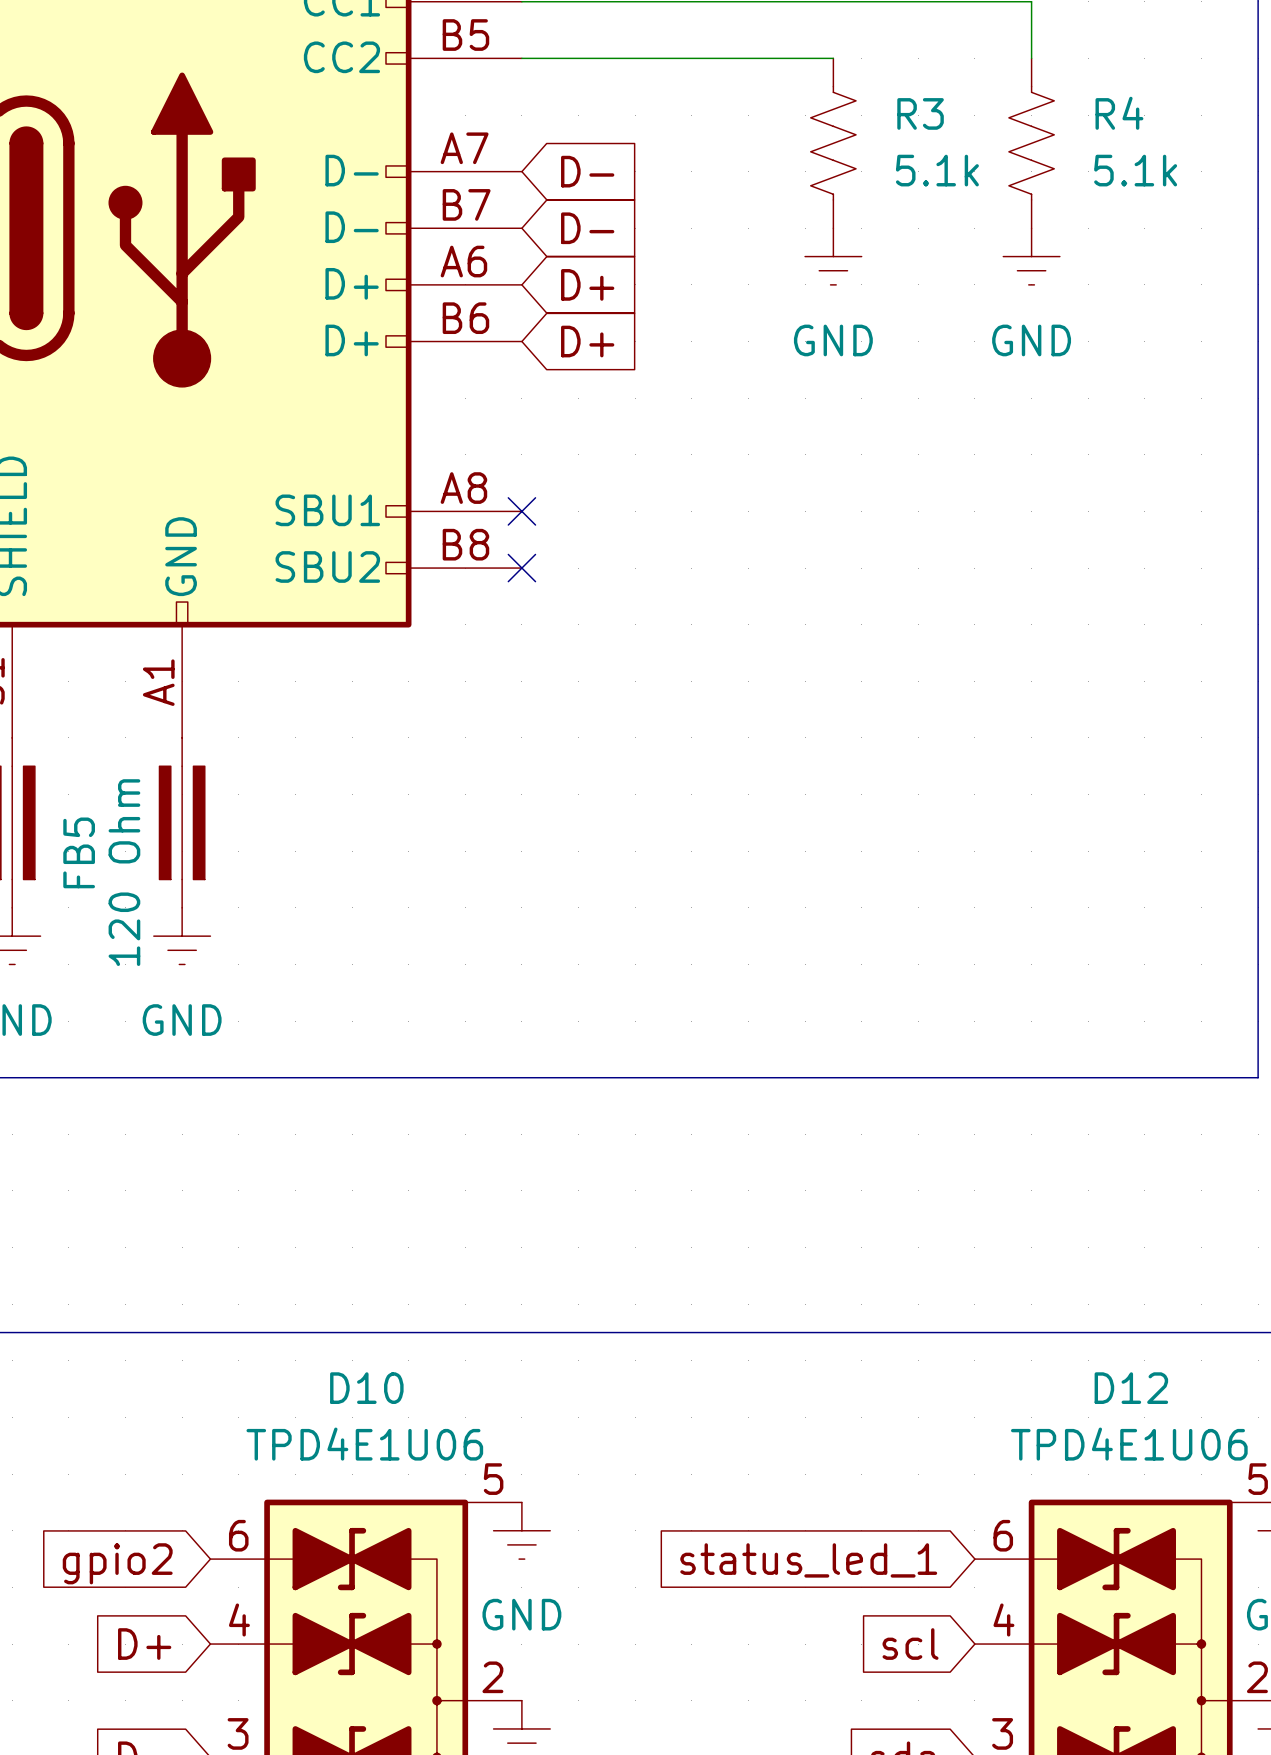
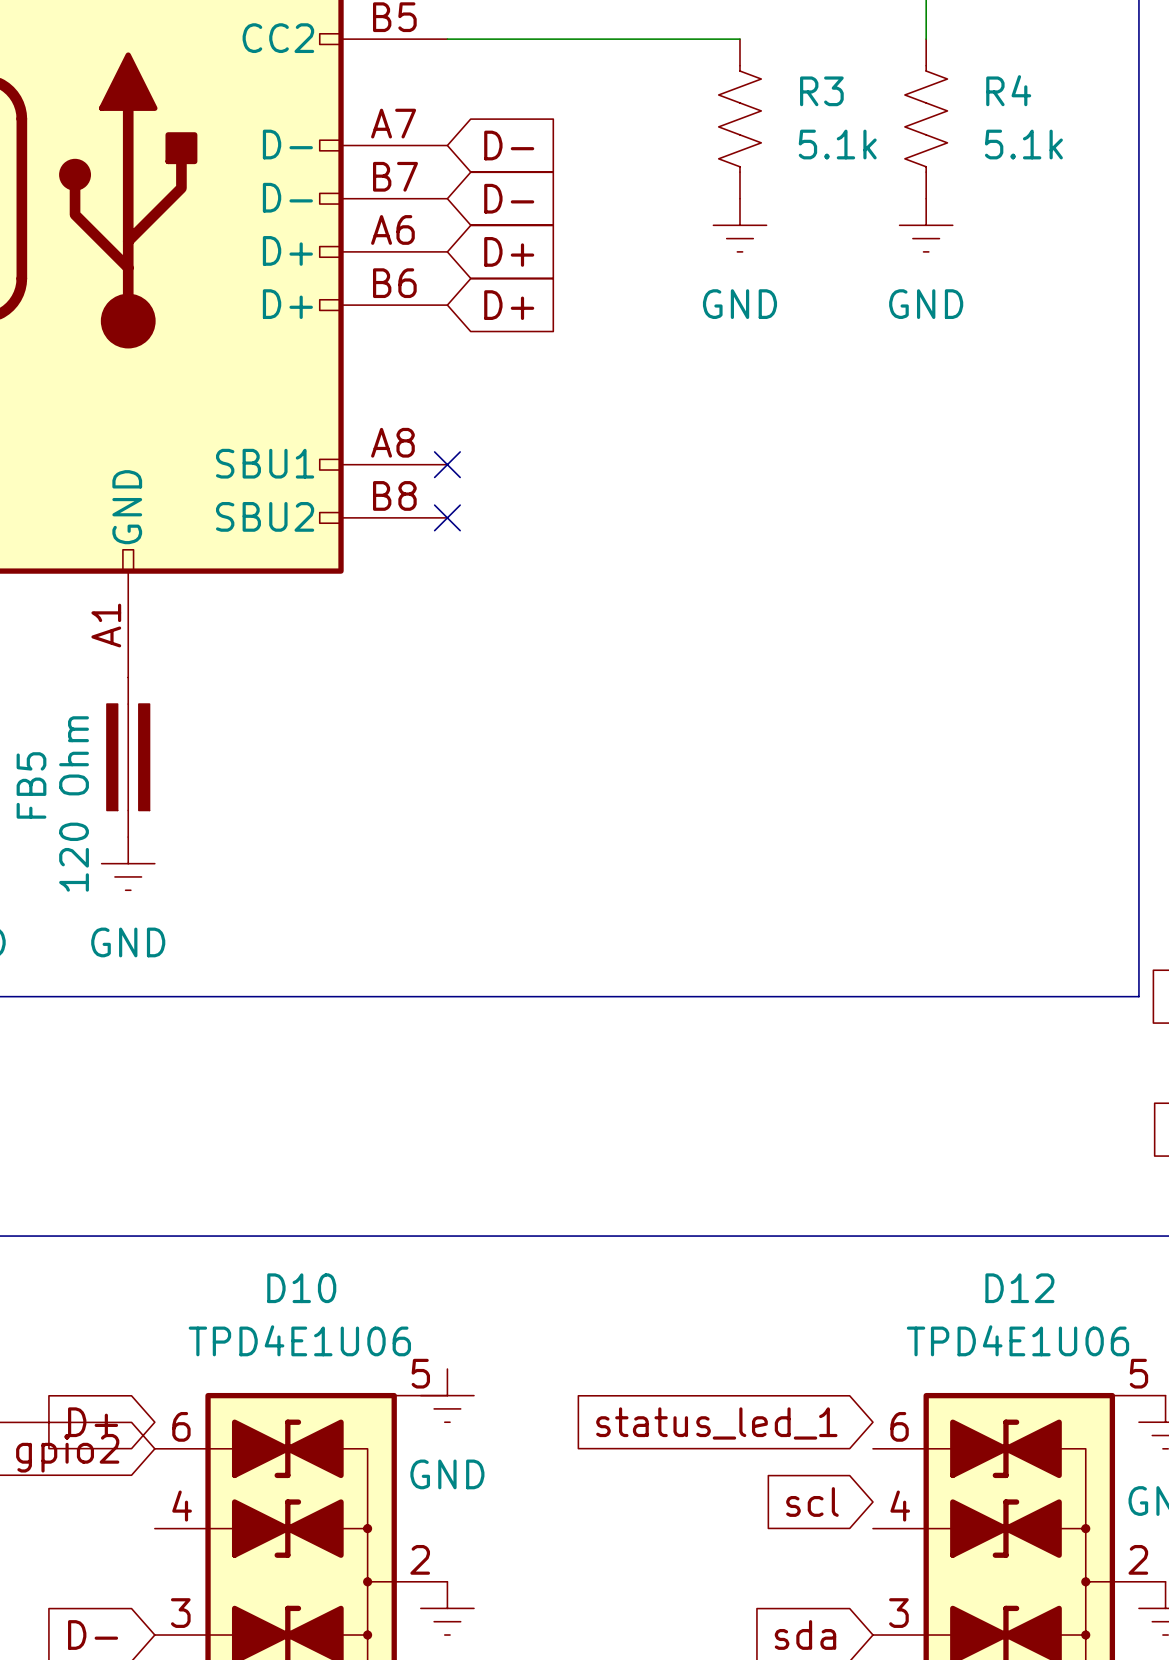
power symbol position: GND (521, 1530) -> GND (447, 1395)
global label position: status_led_1 (808, 1560) -> status_led_1 (716, 1423)
global label position: D+ (144, 1644) -> D+ (93, 1422)
global label position: scl (910, 1644) -> scl (812, 1502)

